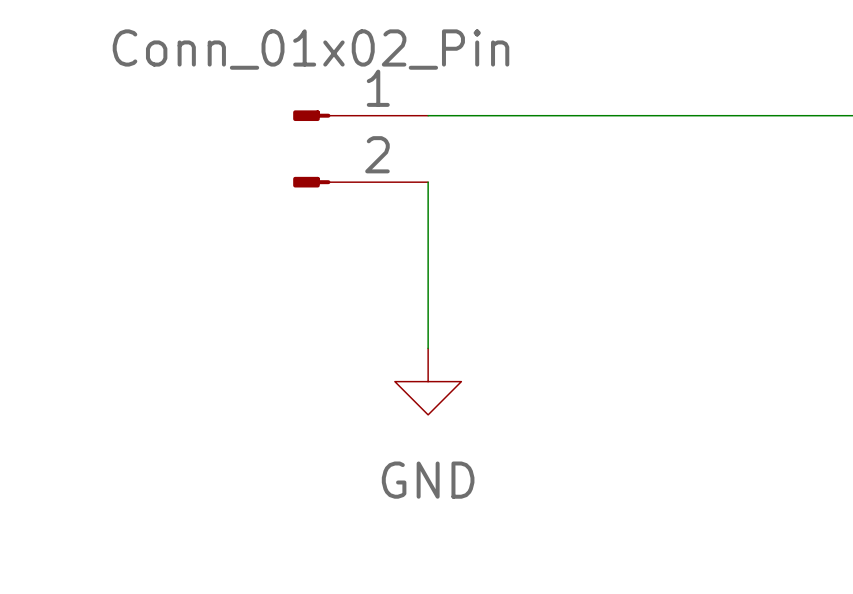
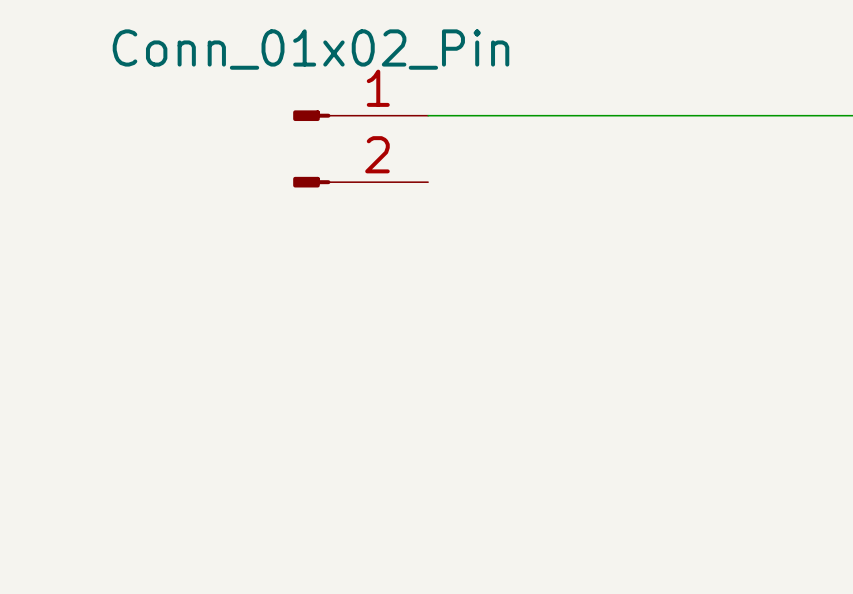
wire: (428, 182) (428, 348) -> none
power symbol: GND (428, 381) -> none

